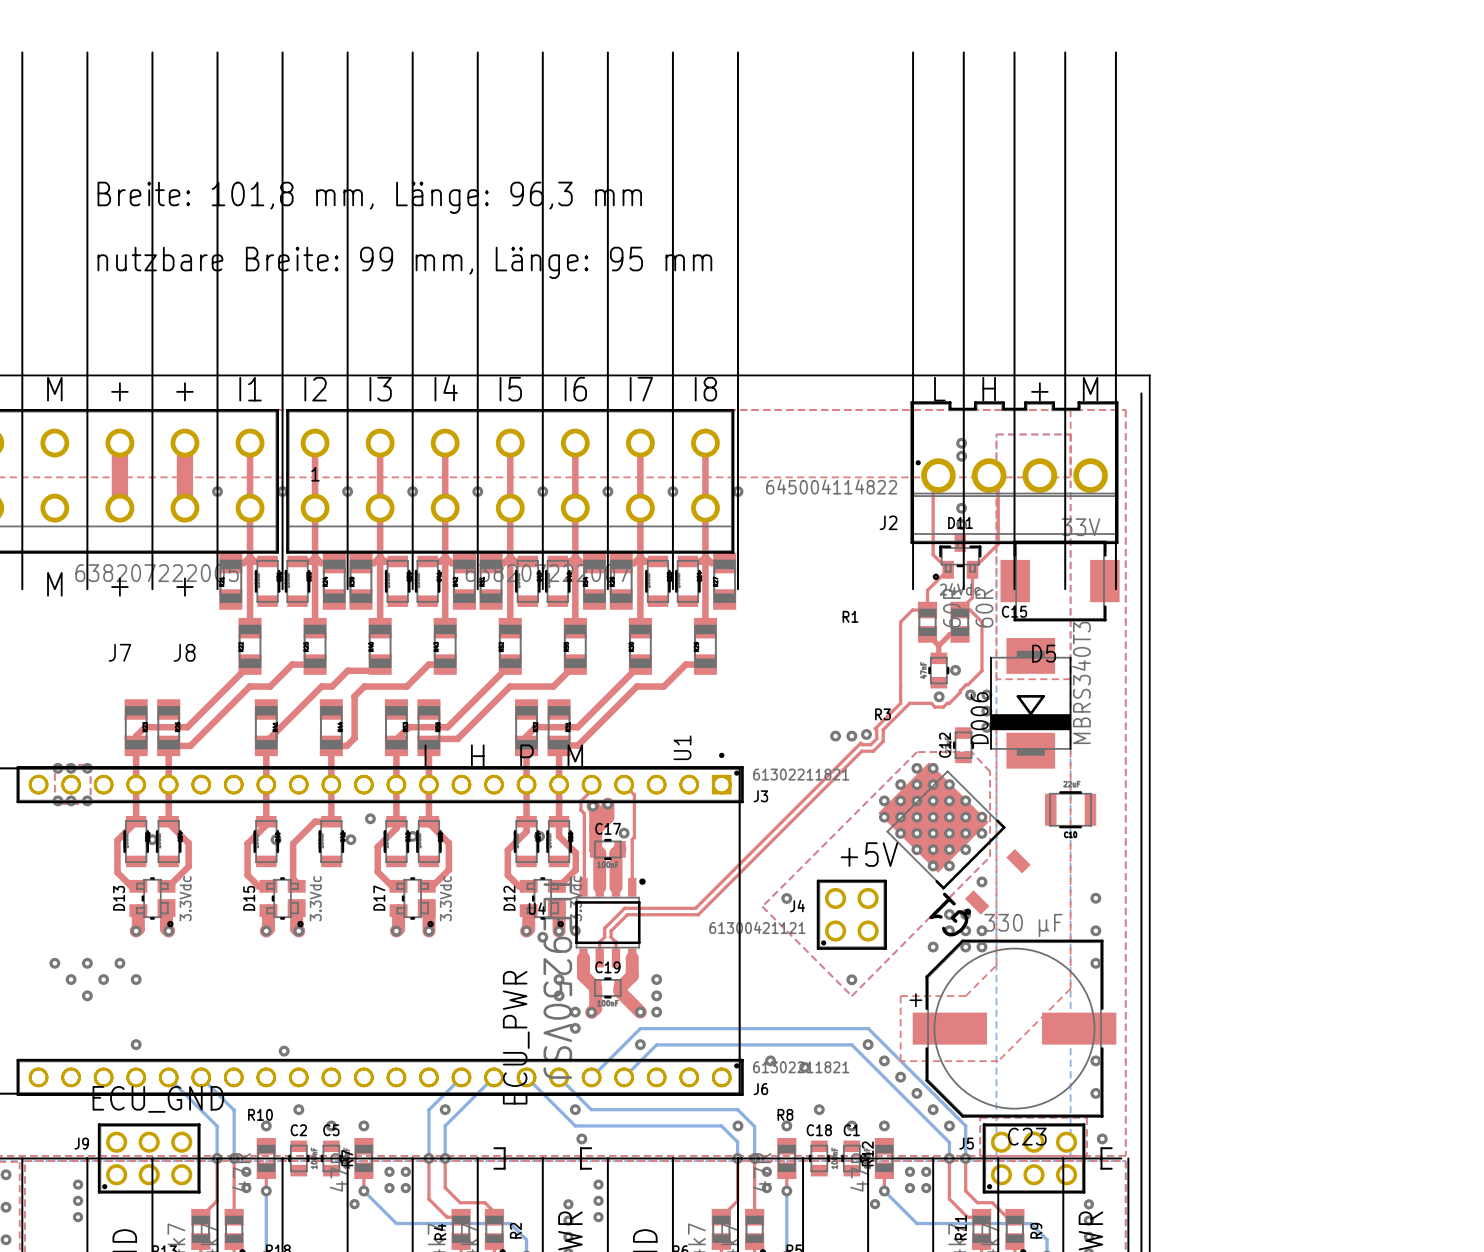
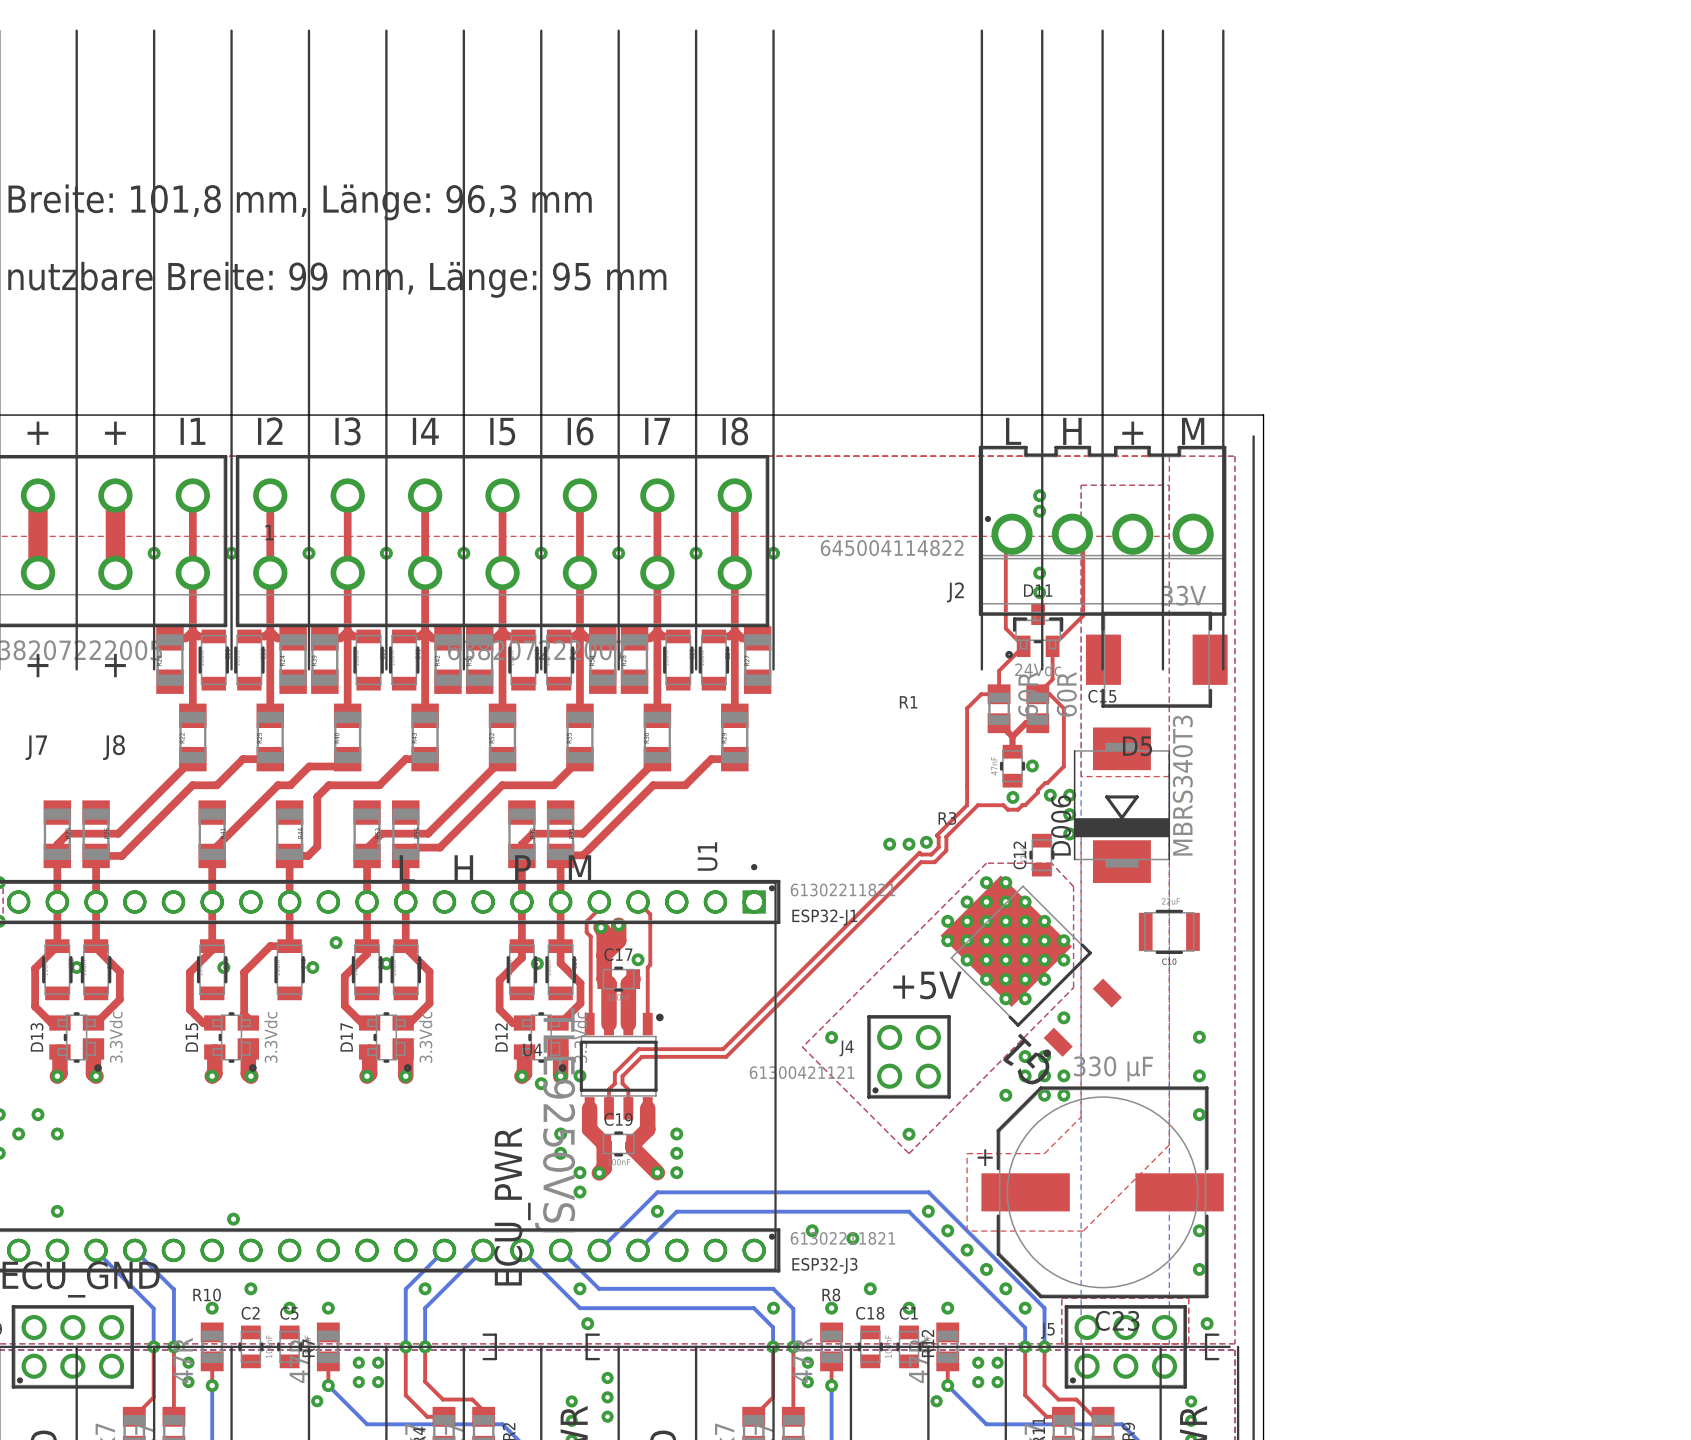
J3 name: J3 (760, 796) -> ESP32-J1 (824, 917)
J6 name: J6 (760, 1089) -> ESP32-J3 (824, 1265)

